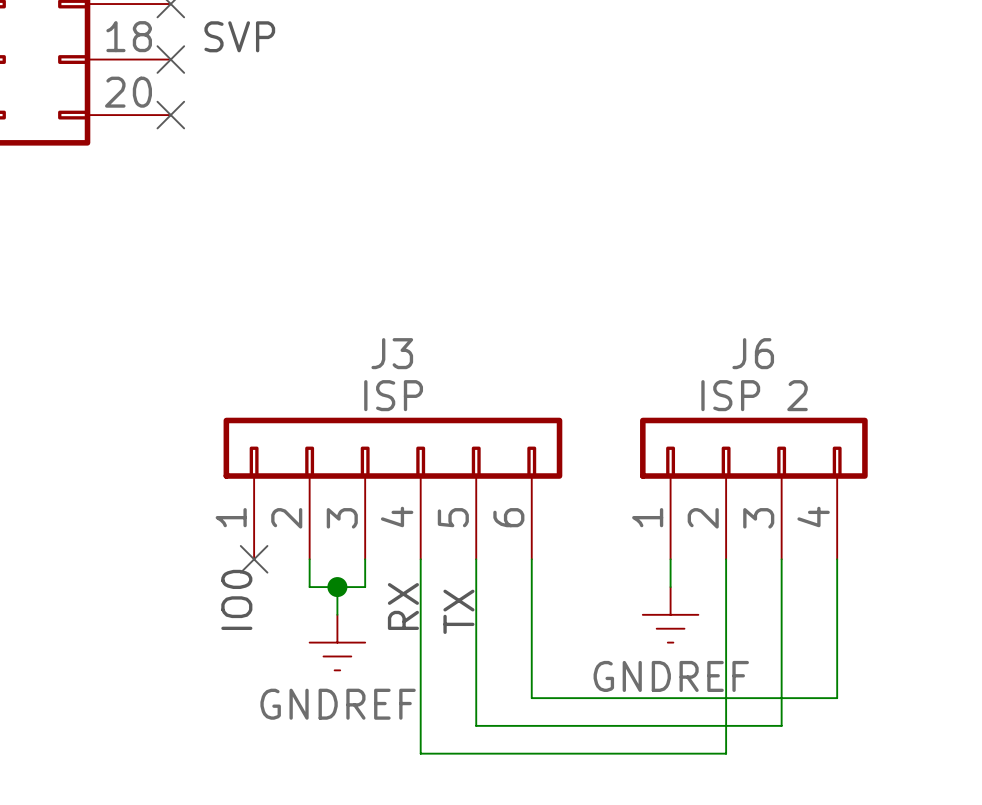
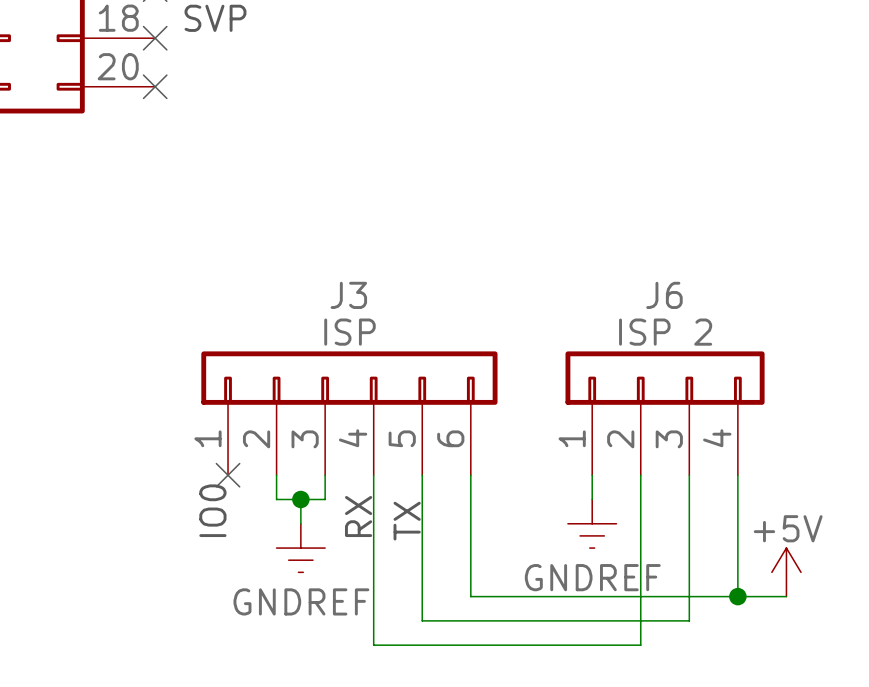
power symbol: none -> +5V (786, 572)
wire: none -> (737, 596) (786, 596)
junction: none -> (737, 596)

